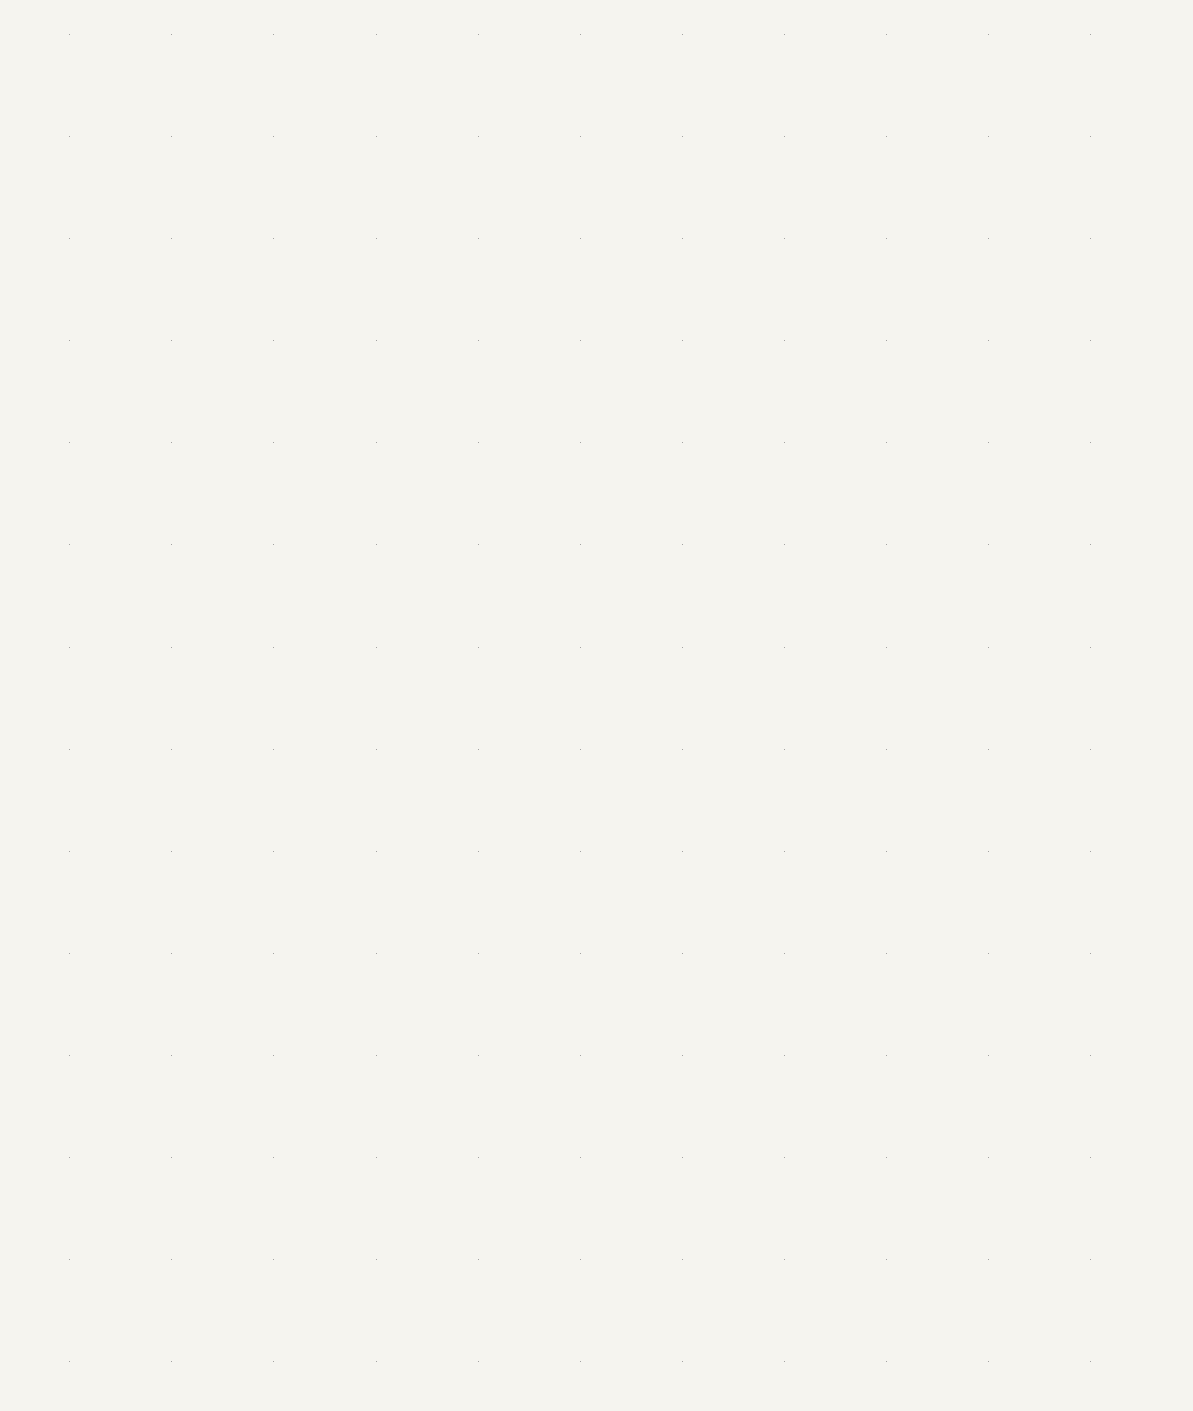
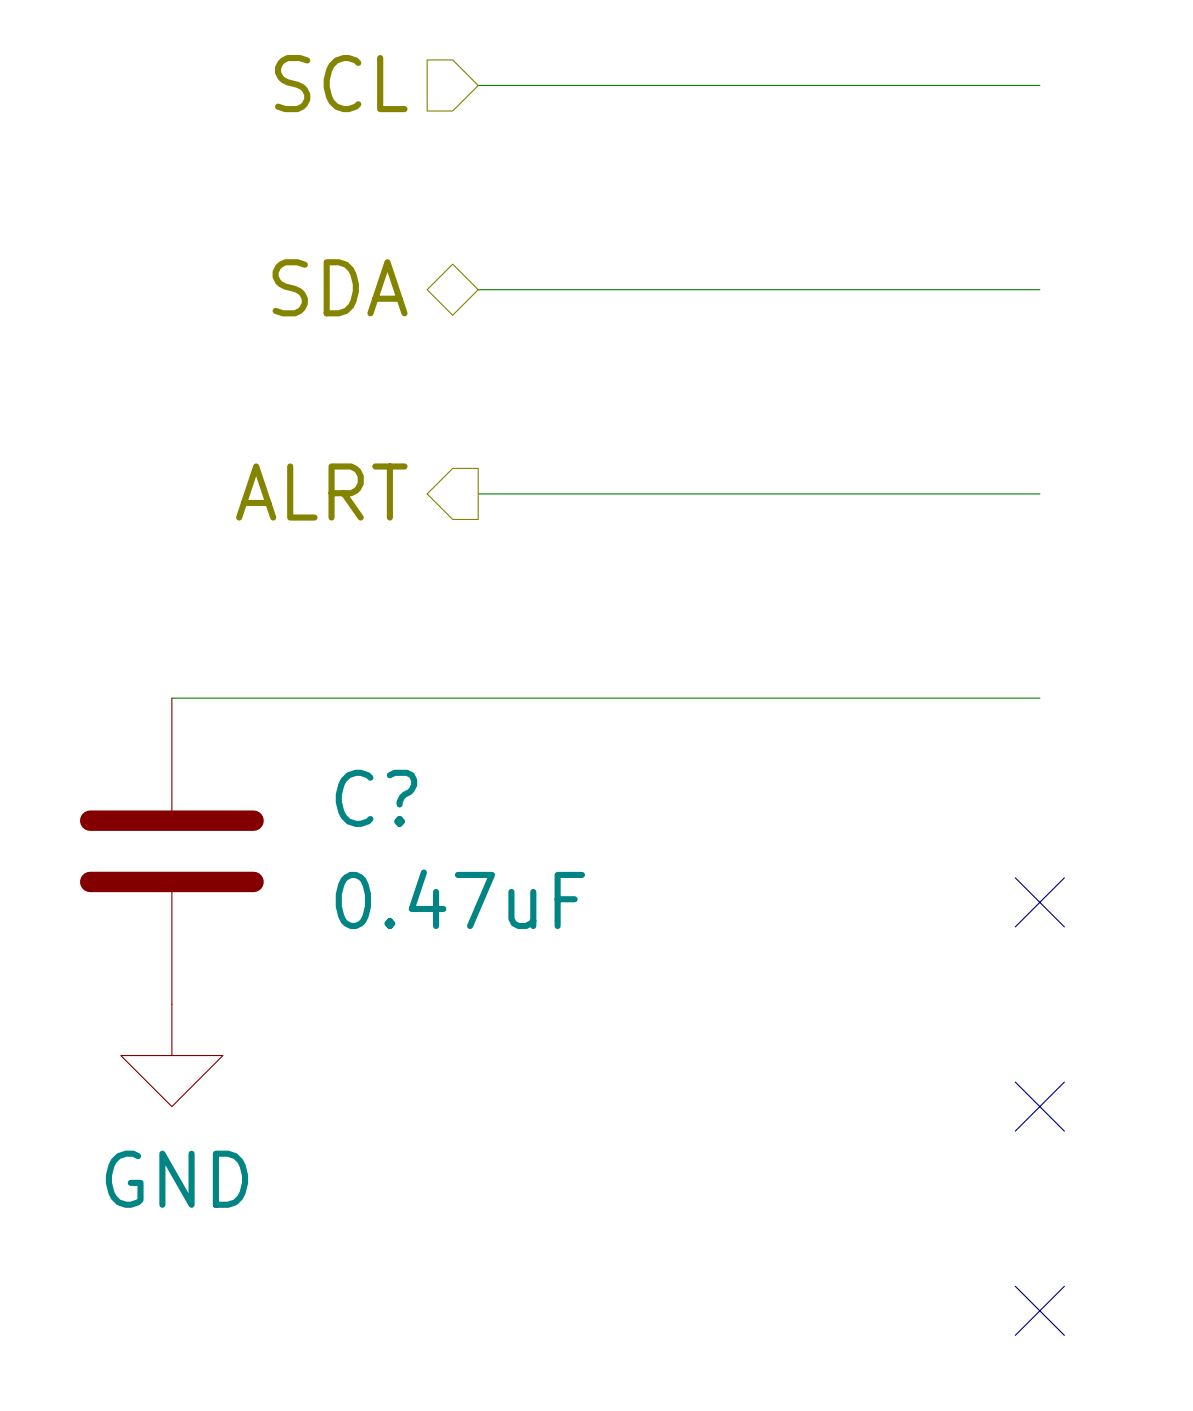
hierarchical label: none -> SCL (341, 83)
wire: none -> (478, 85) (1039, 85)
hierarchical label: none -> SDA (340, 287)
wire: none -> (478, 289) (1039, 289)
hierarchical label: none -> ALRT (321, 492)
wire: none -> (478, 493) (1039, 493)
wire: none -> (171, 698) (1039, 698)
C?: none -> 0.47uF (171, 851)
no-connect mark: none -> (1039, 902)
power symbol: none -> GND (171, 1055)
no-connect mark: none -> (1039, 1106)
no-connect mark: none -> (1039, 1310)

